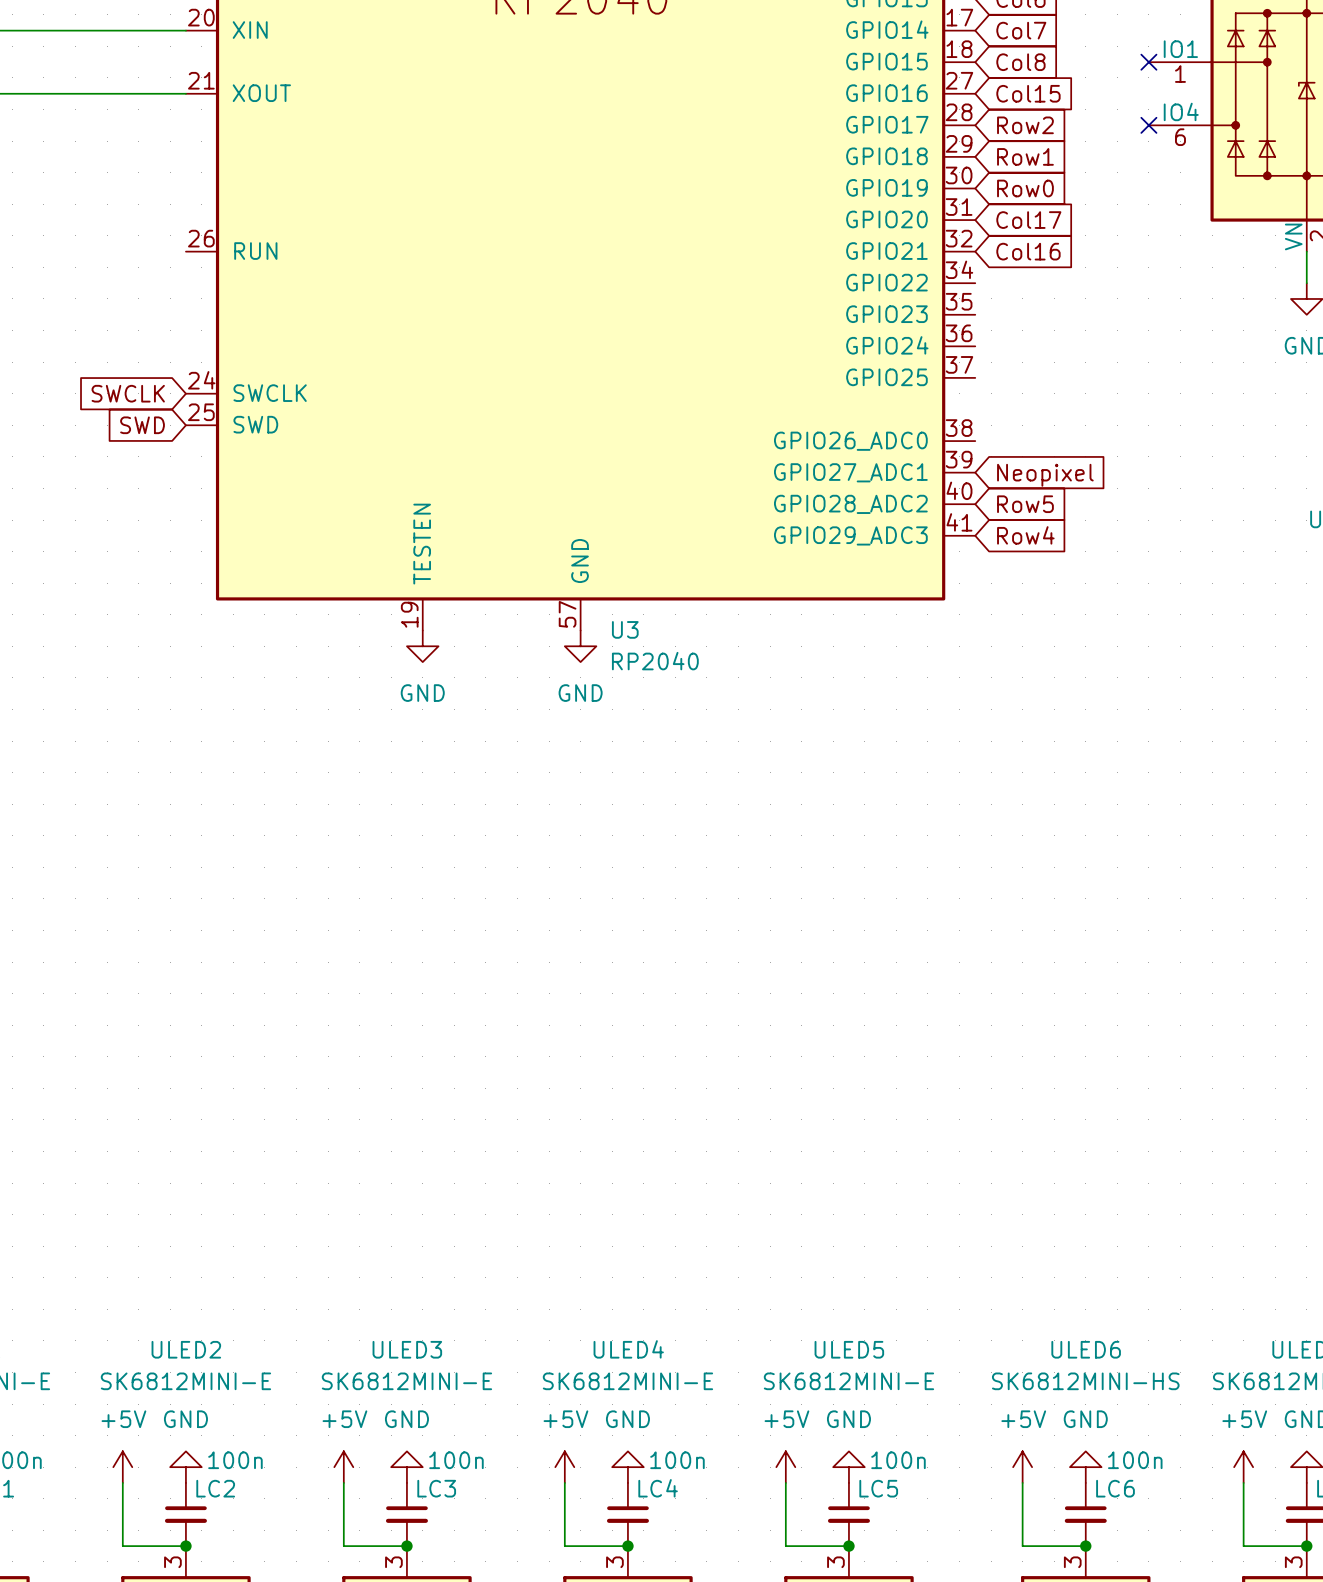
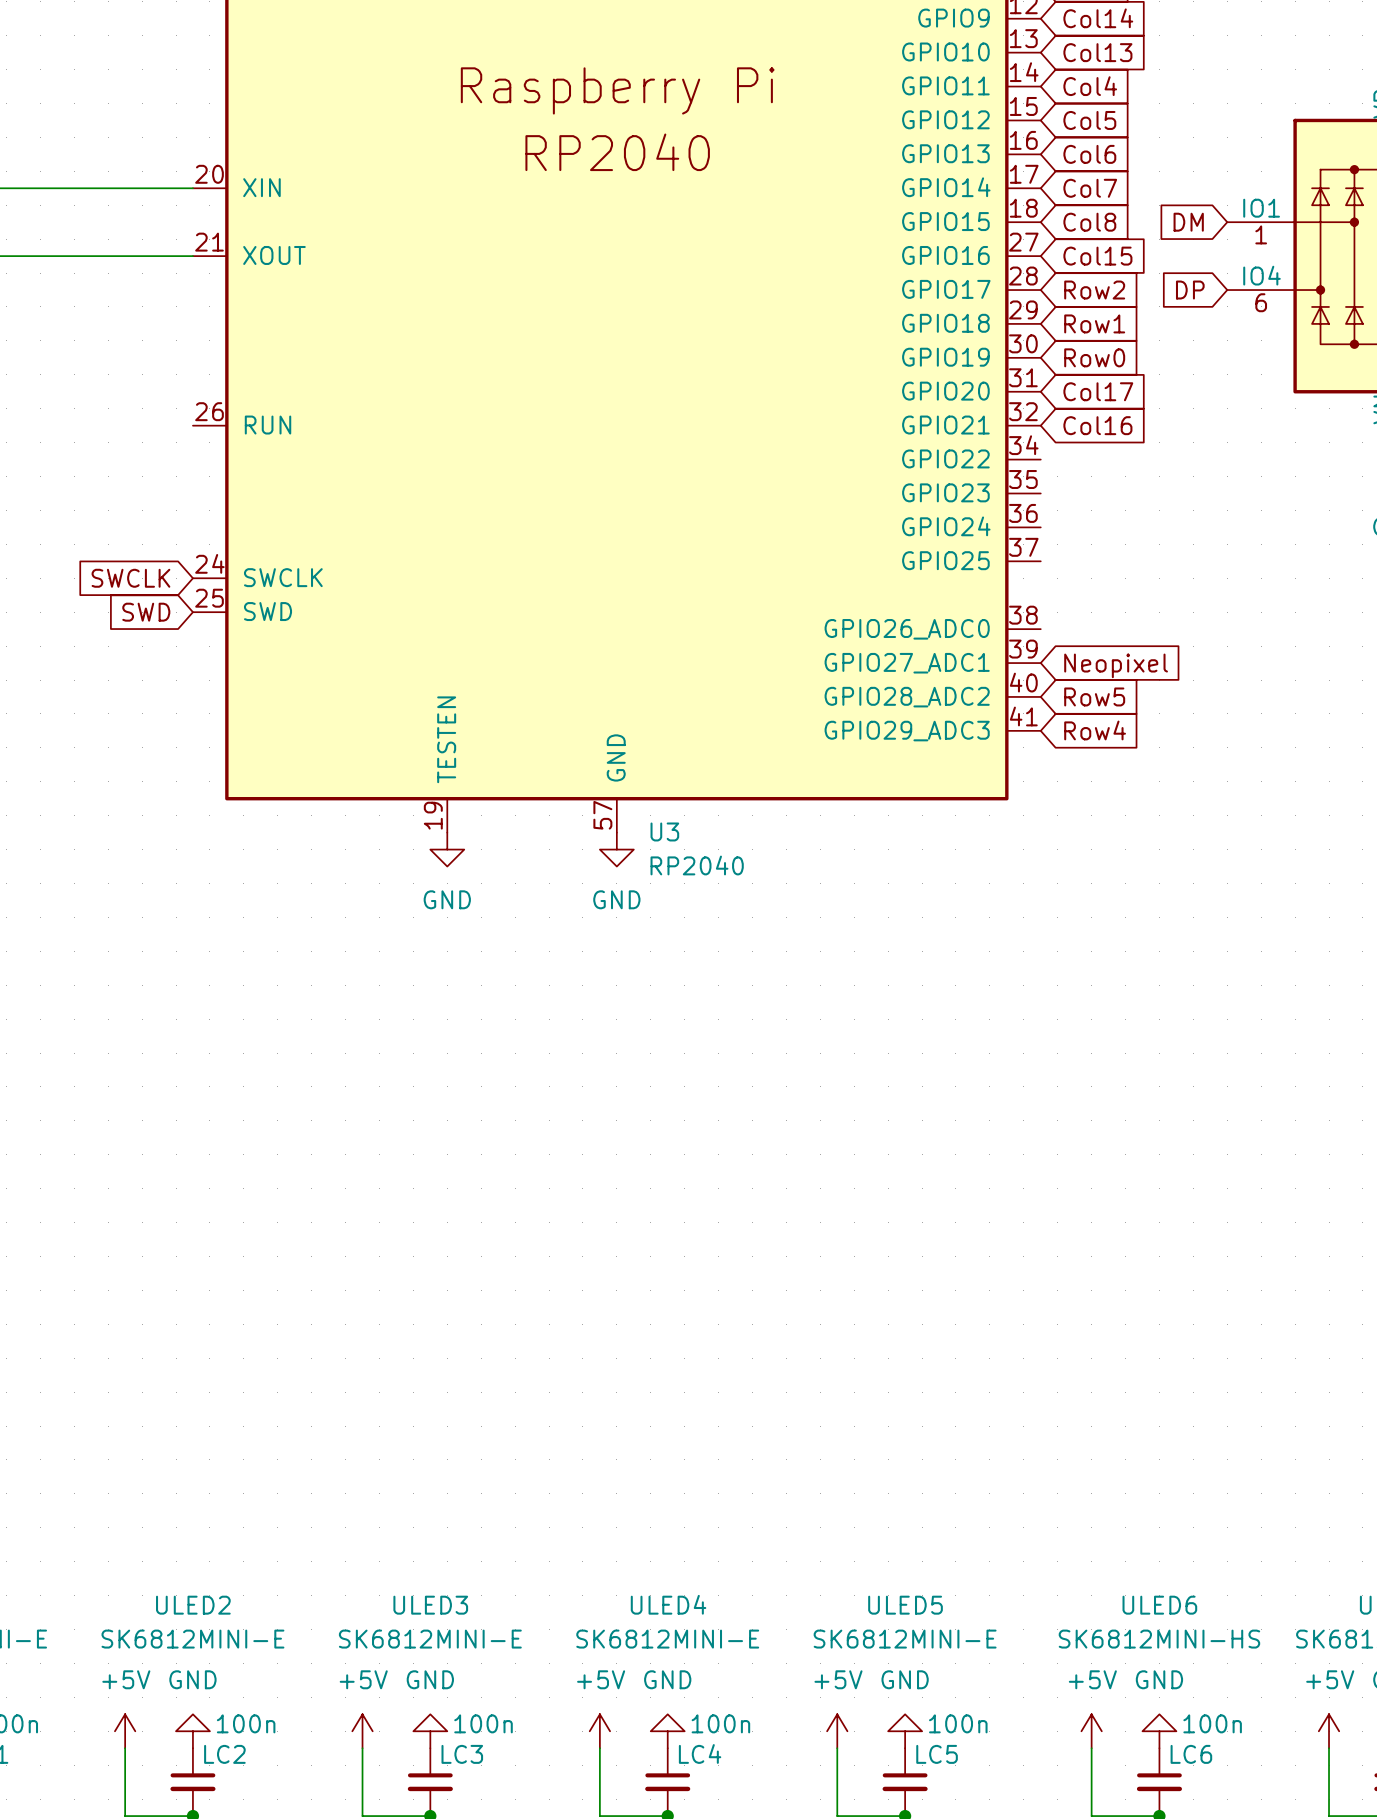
global label: none -> DM (1188, 222)
no-connect mark: (1148, 62) -> none
global label: none -> DP (1190, 290)
no-connect mark: (1148, 125) -> none

